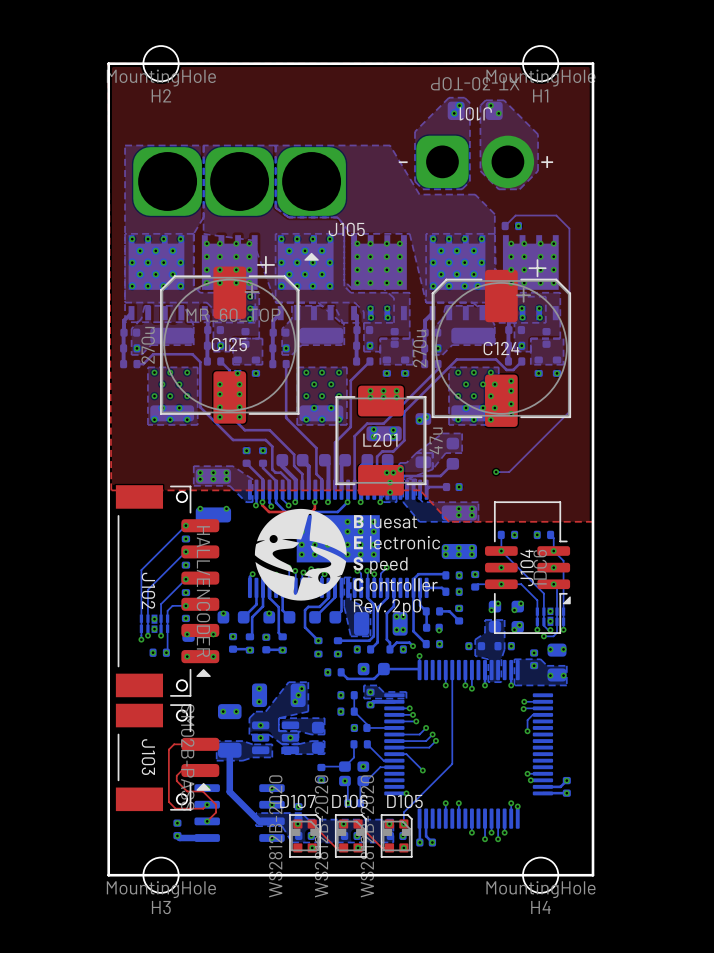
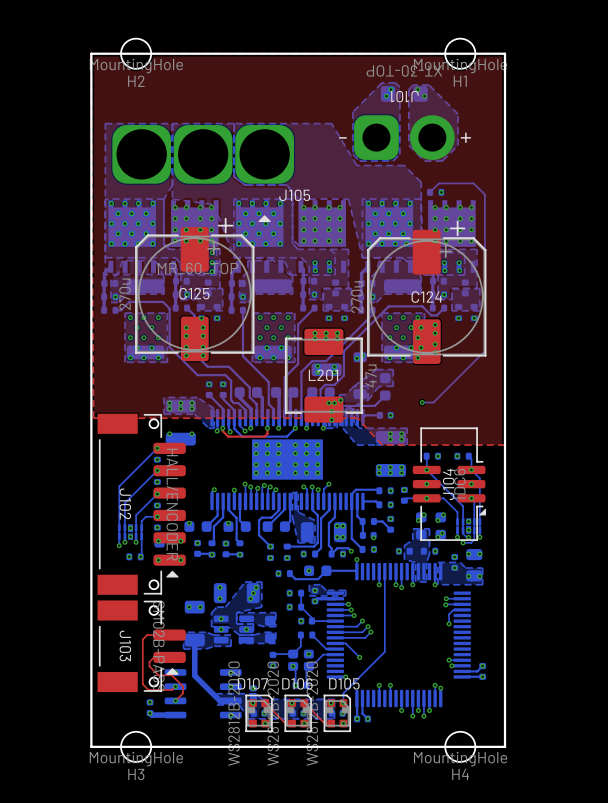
drawing: [254, 508, 347, 601] -> none
text: B (358, 521) -> none
text: luesat (393, 521) -> none
text: E (358, 542) -> none
text: lectronic (405, 542) -> none
text: S (358, 563) -> none
text: peed (388, 565) -> none
text: C (358, 584) -> none
text: ontroller (403, 584) -> none
text: Rev. 2p0 (387, 607) -> none

